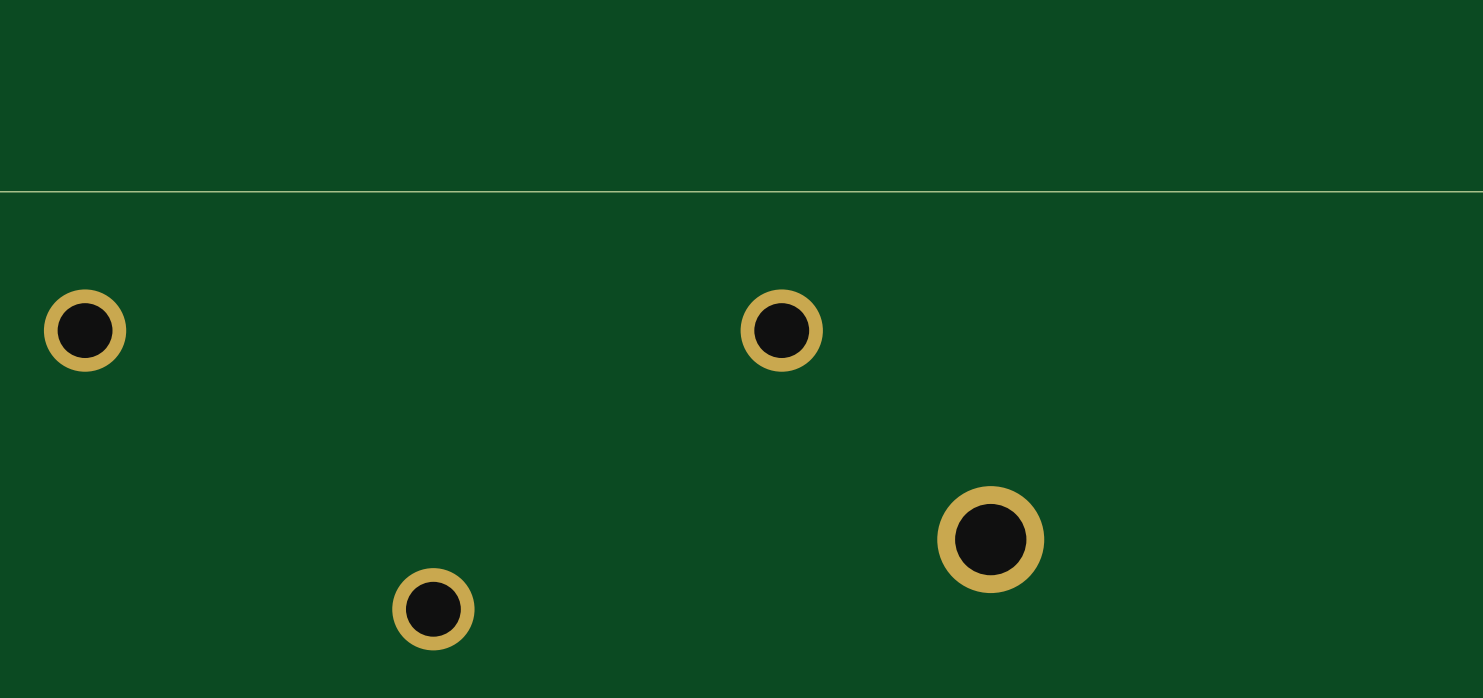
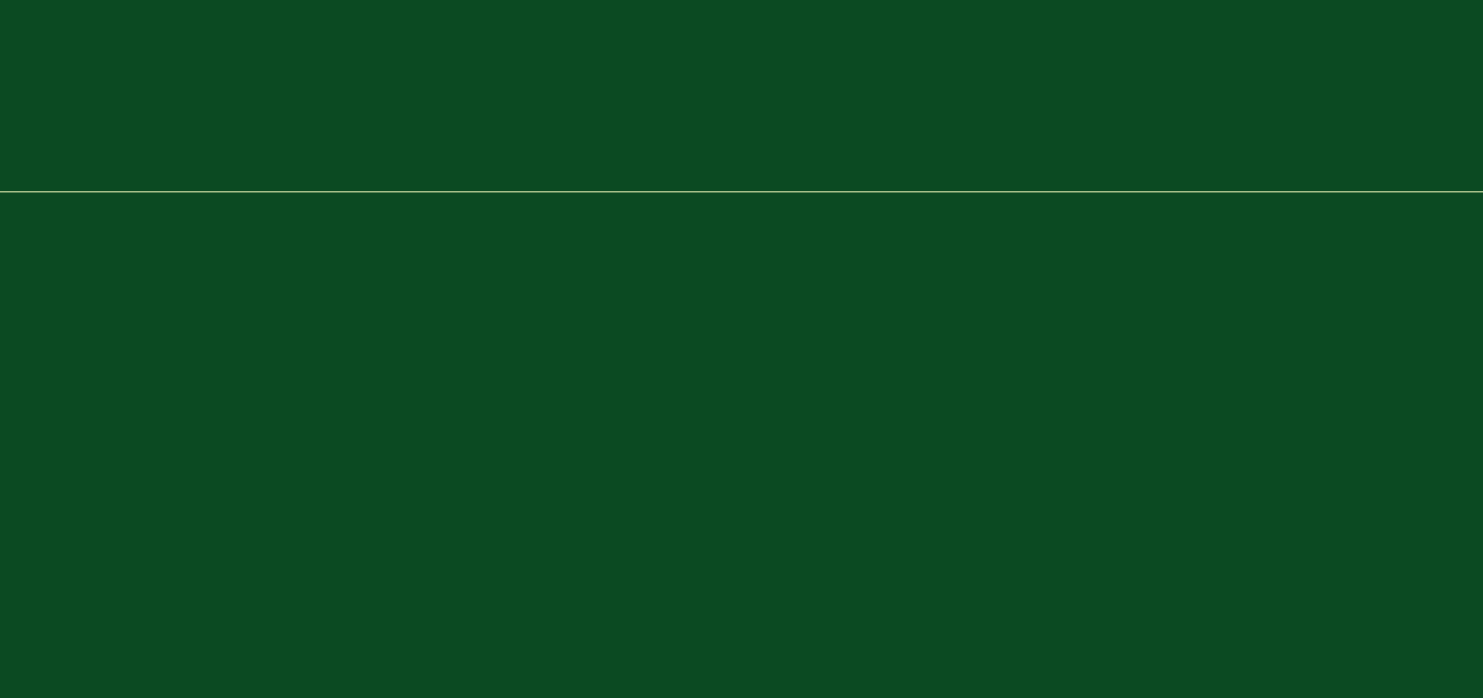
via: (85, 330) -> none
via: (781, 330) -> none
via: (990, 539) -> none
via: (433, 609) -> none

